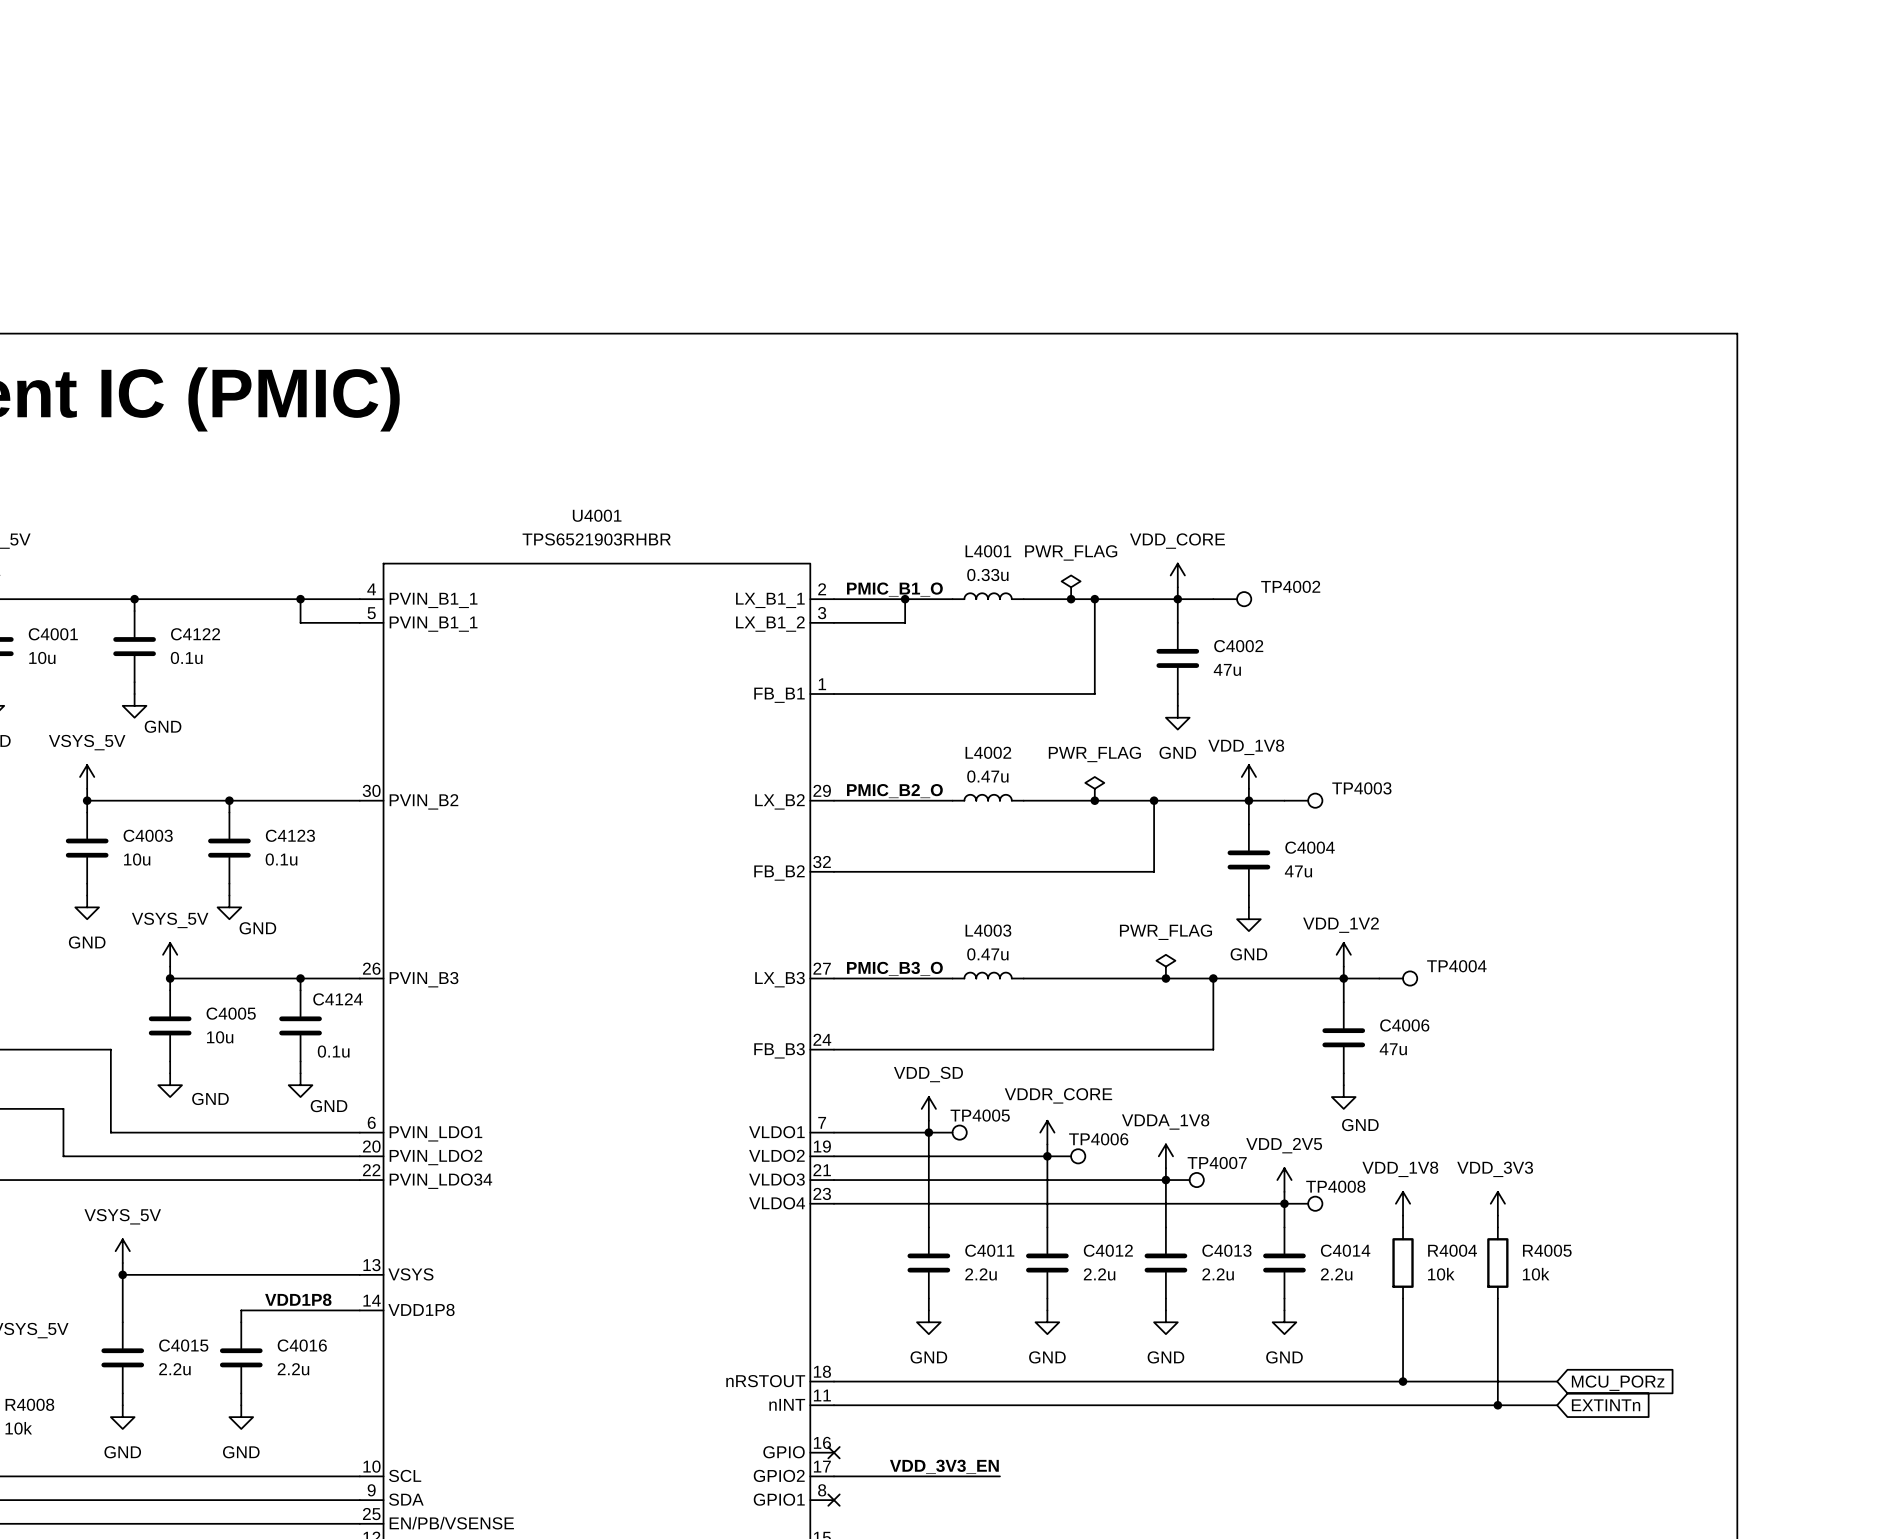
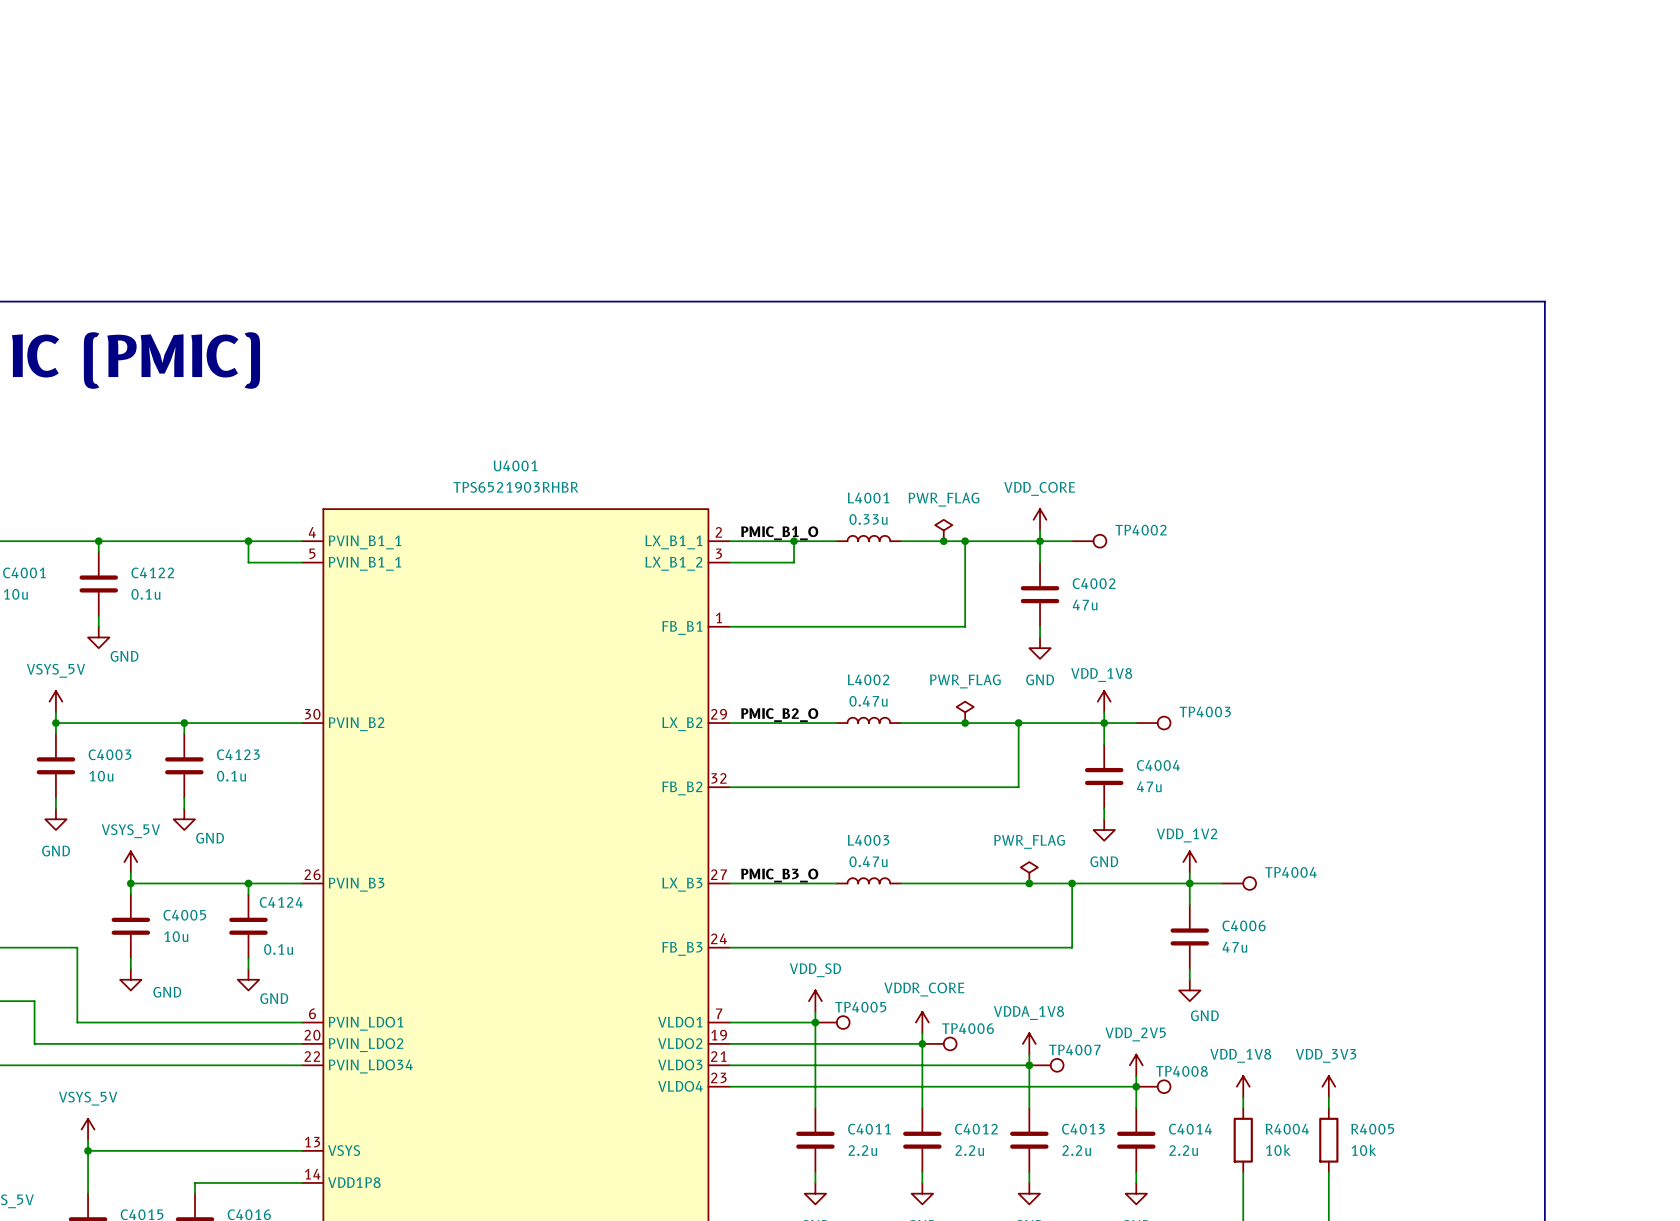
label: VDD1P8 (298, 1299) -> none

